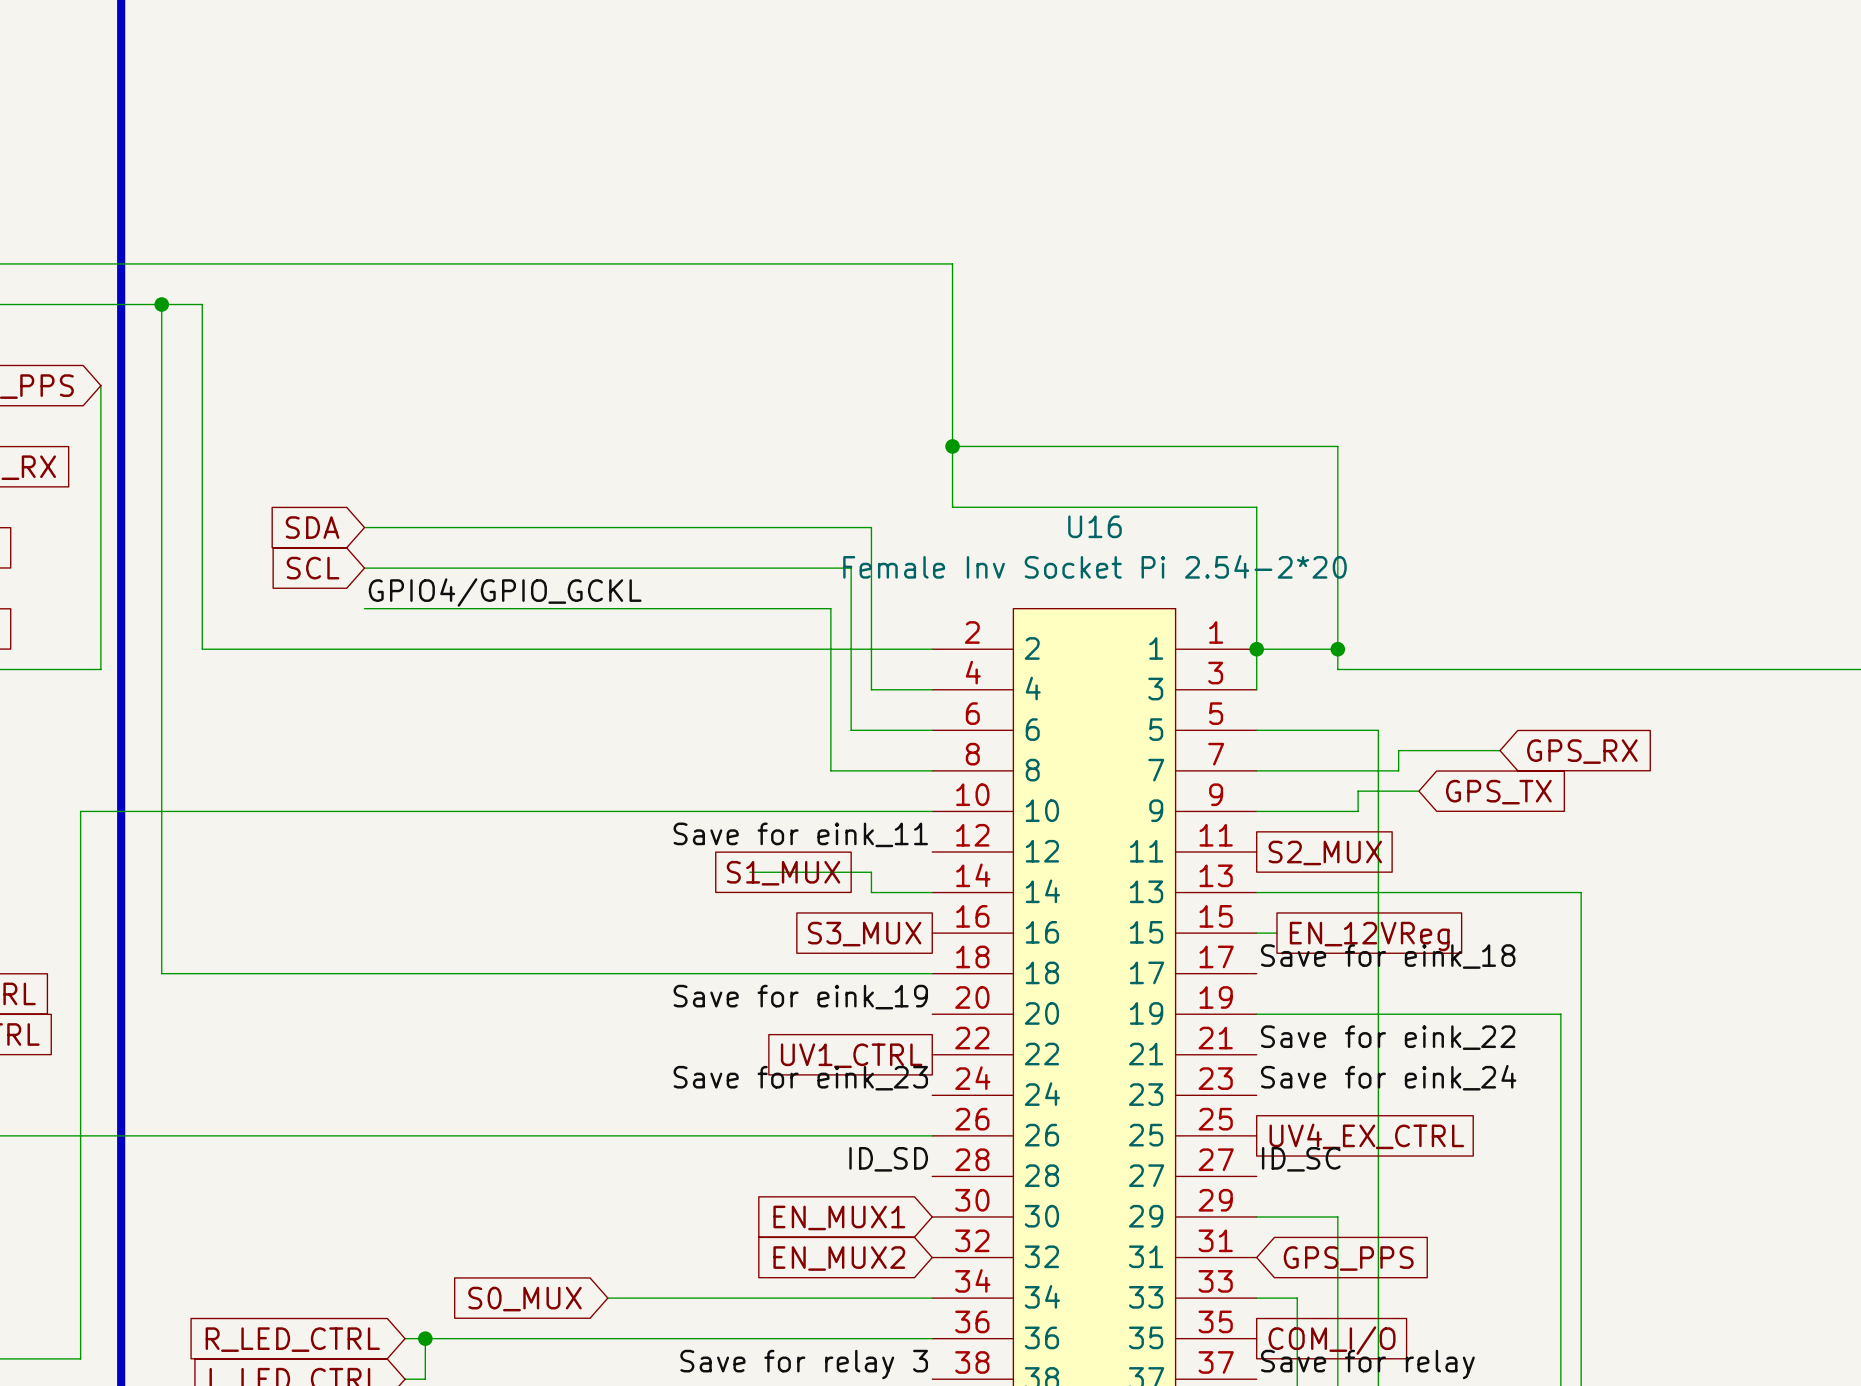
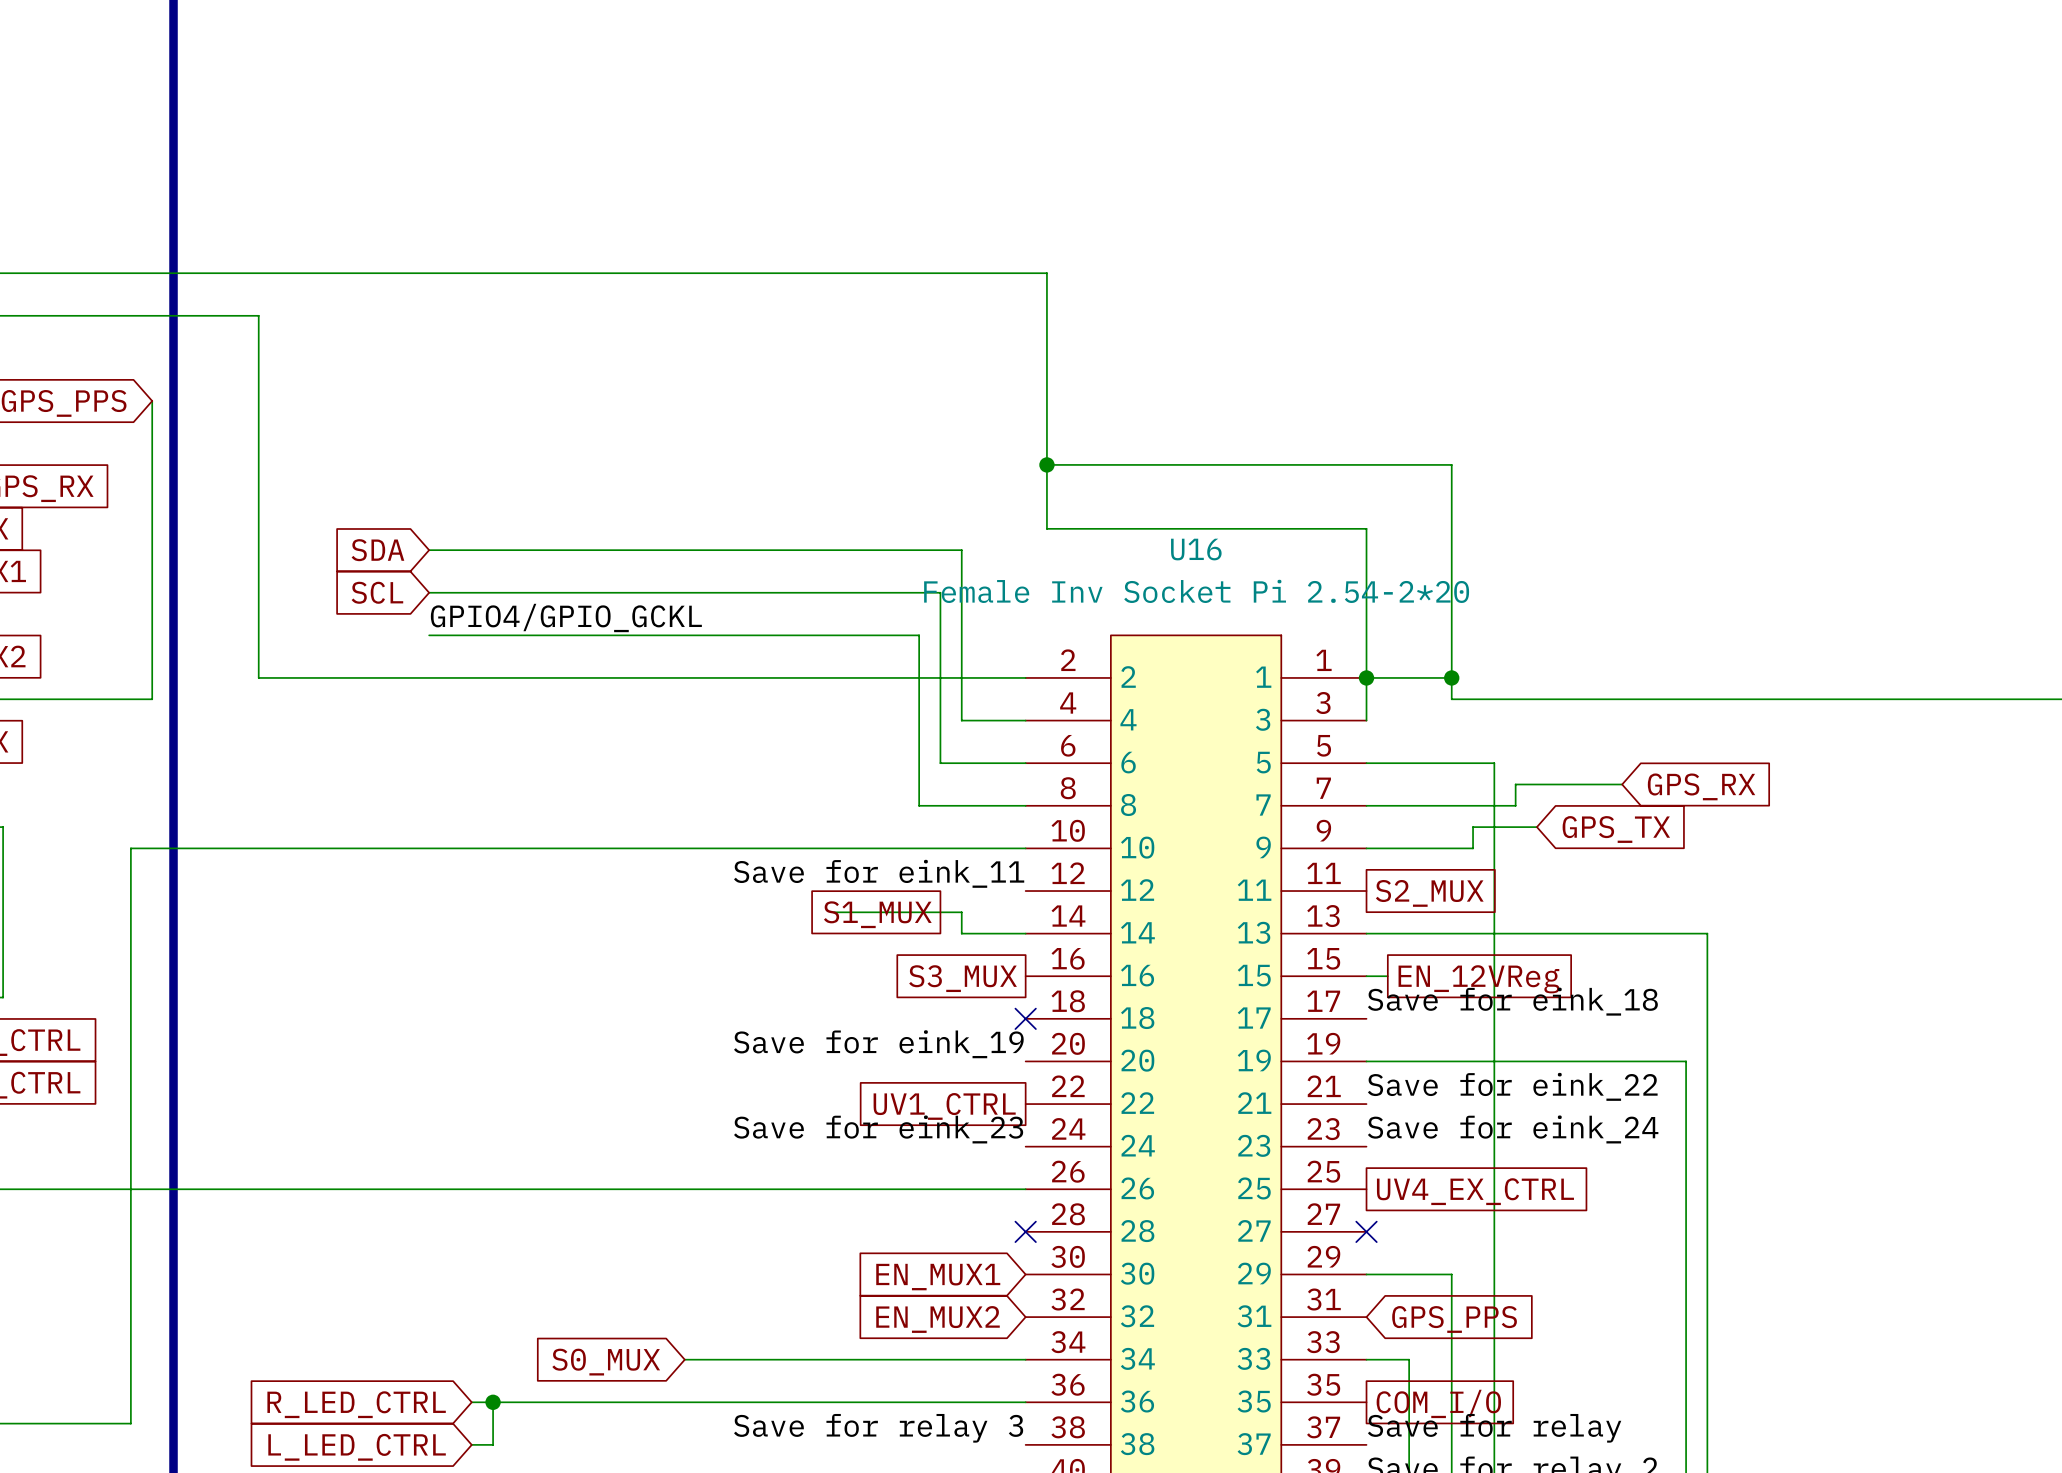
wire: (161, 304) (161, 973) (932, 973) -> none
junction: (161, 304) -> none
no-connect mark: none -> (1025, 1018)
label: ID_SD (888, 1159) -> none
label: ID_SC (1301, 1159) -> none
no-connect mark: none -> (1025, 1231)
no-connect mark: none -> (1366, 1231)

